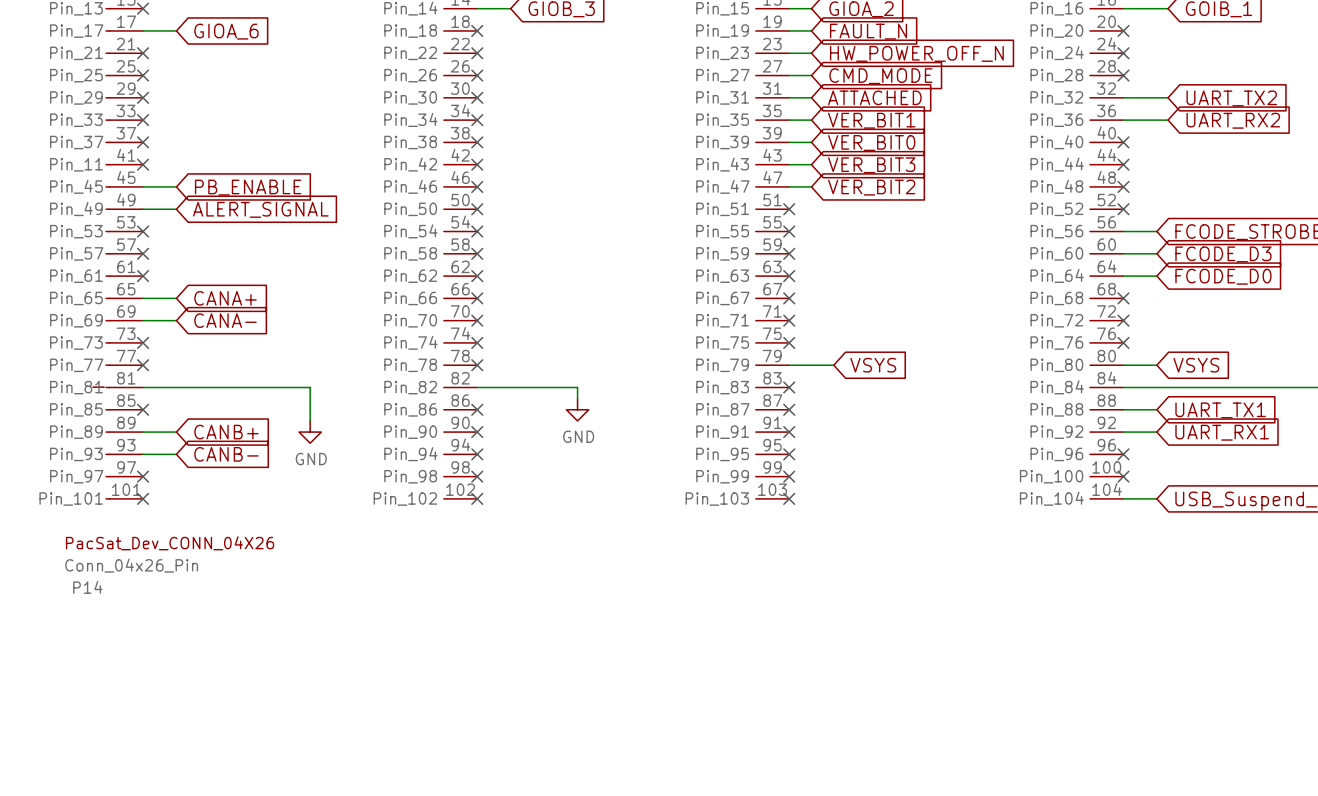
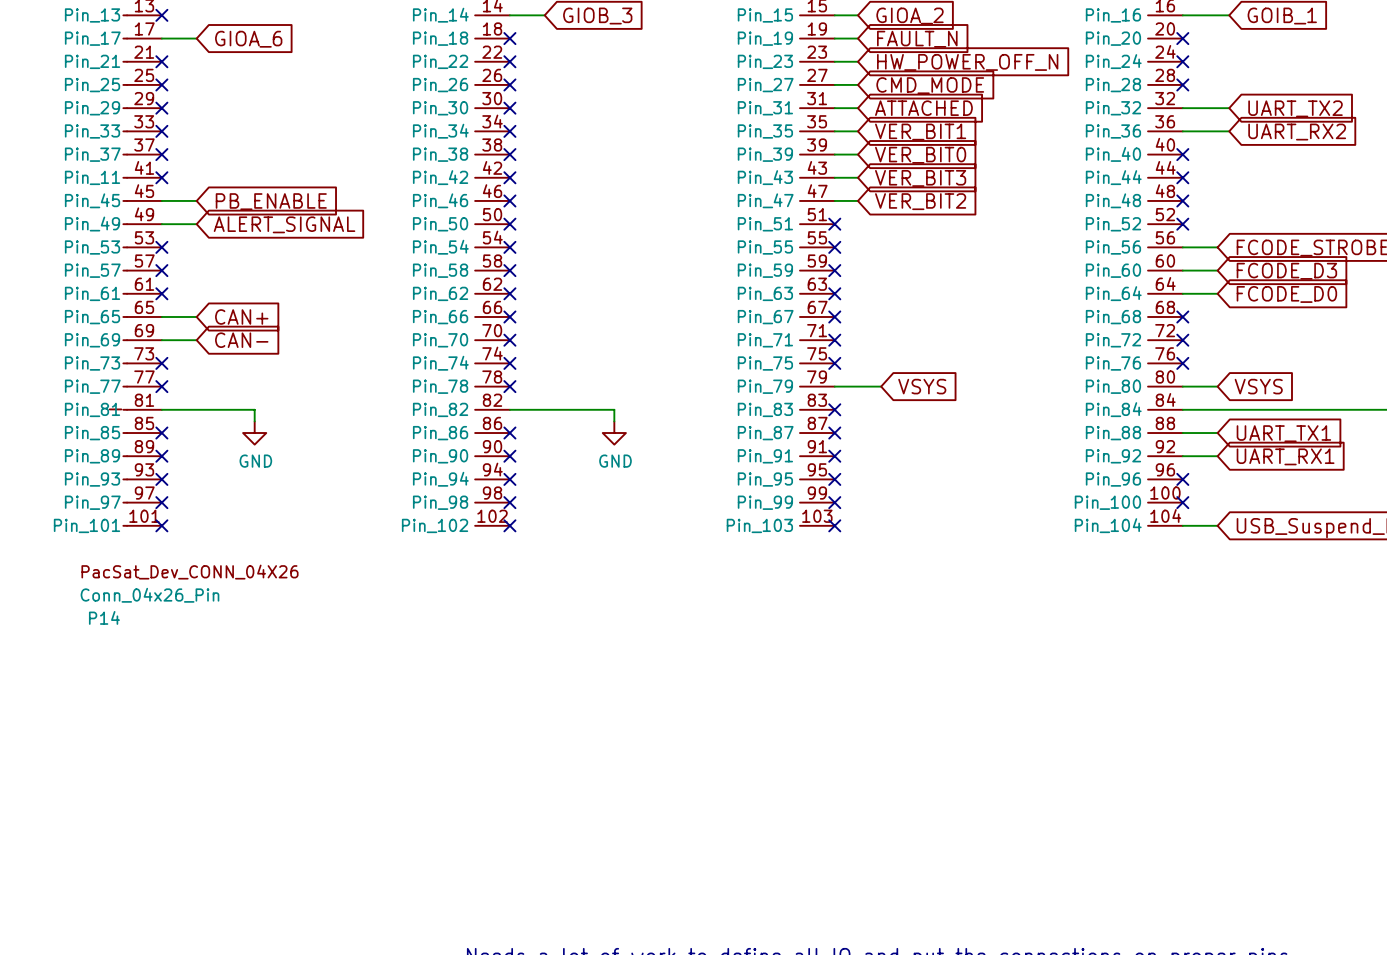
global label: CANA+ (225, 298) -> CAN+ (241, 316)
global label: CANA- (225, 320) -> CAN- (241, 340)
wire: (232, 387) (310, 387) (310, 420) -> (254, 409) (254, 421)
wire: (143, 432) (176, 432) -> none
no-connect mark: none -> (161, 456)
global label: CANB+ (226, 432) -> none
power symbol position: GND (310, 432) -> GND (254, 433)
wire: (143, 454) (176, 454) -> none
no-connect mark: none -> (161, 479)
global label: CANB- (226, 454) -> none

